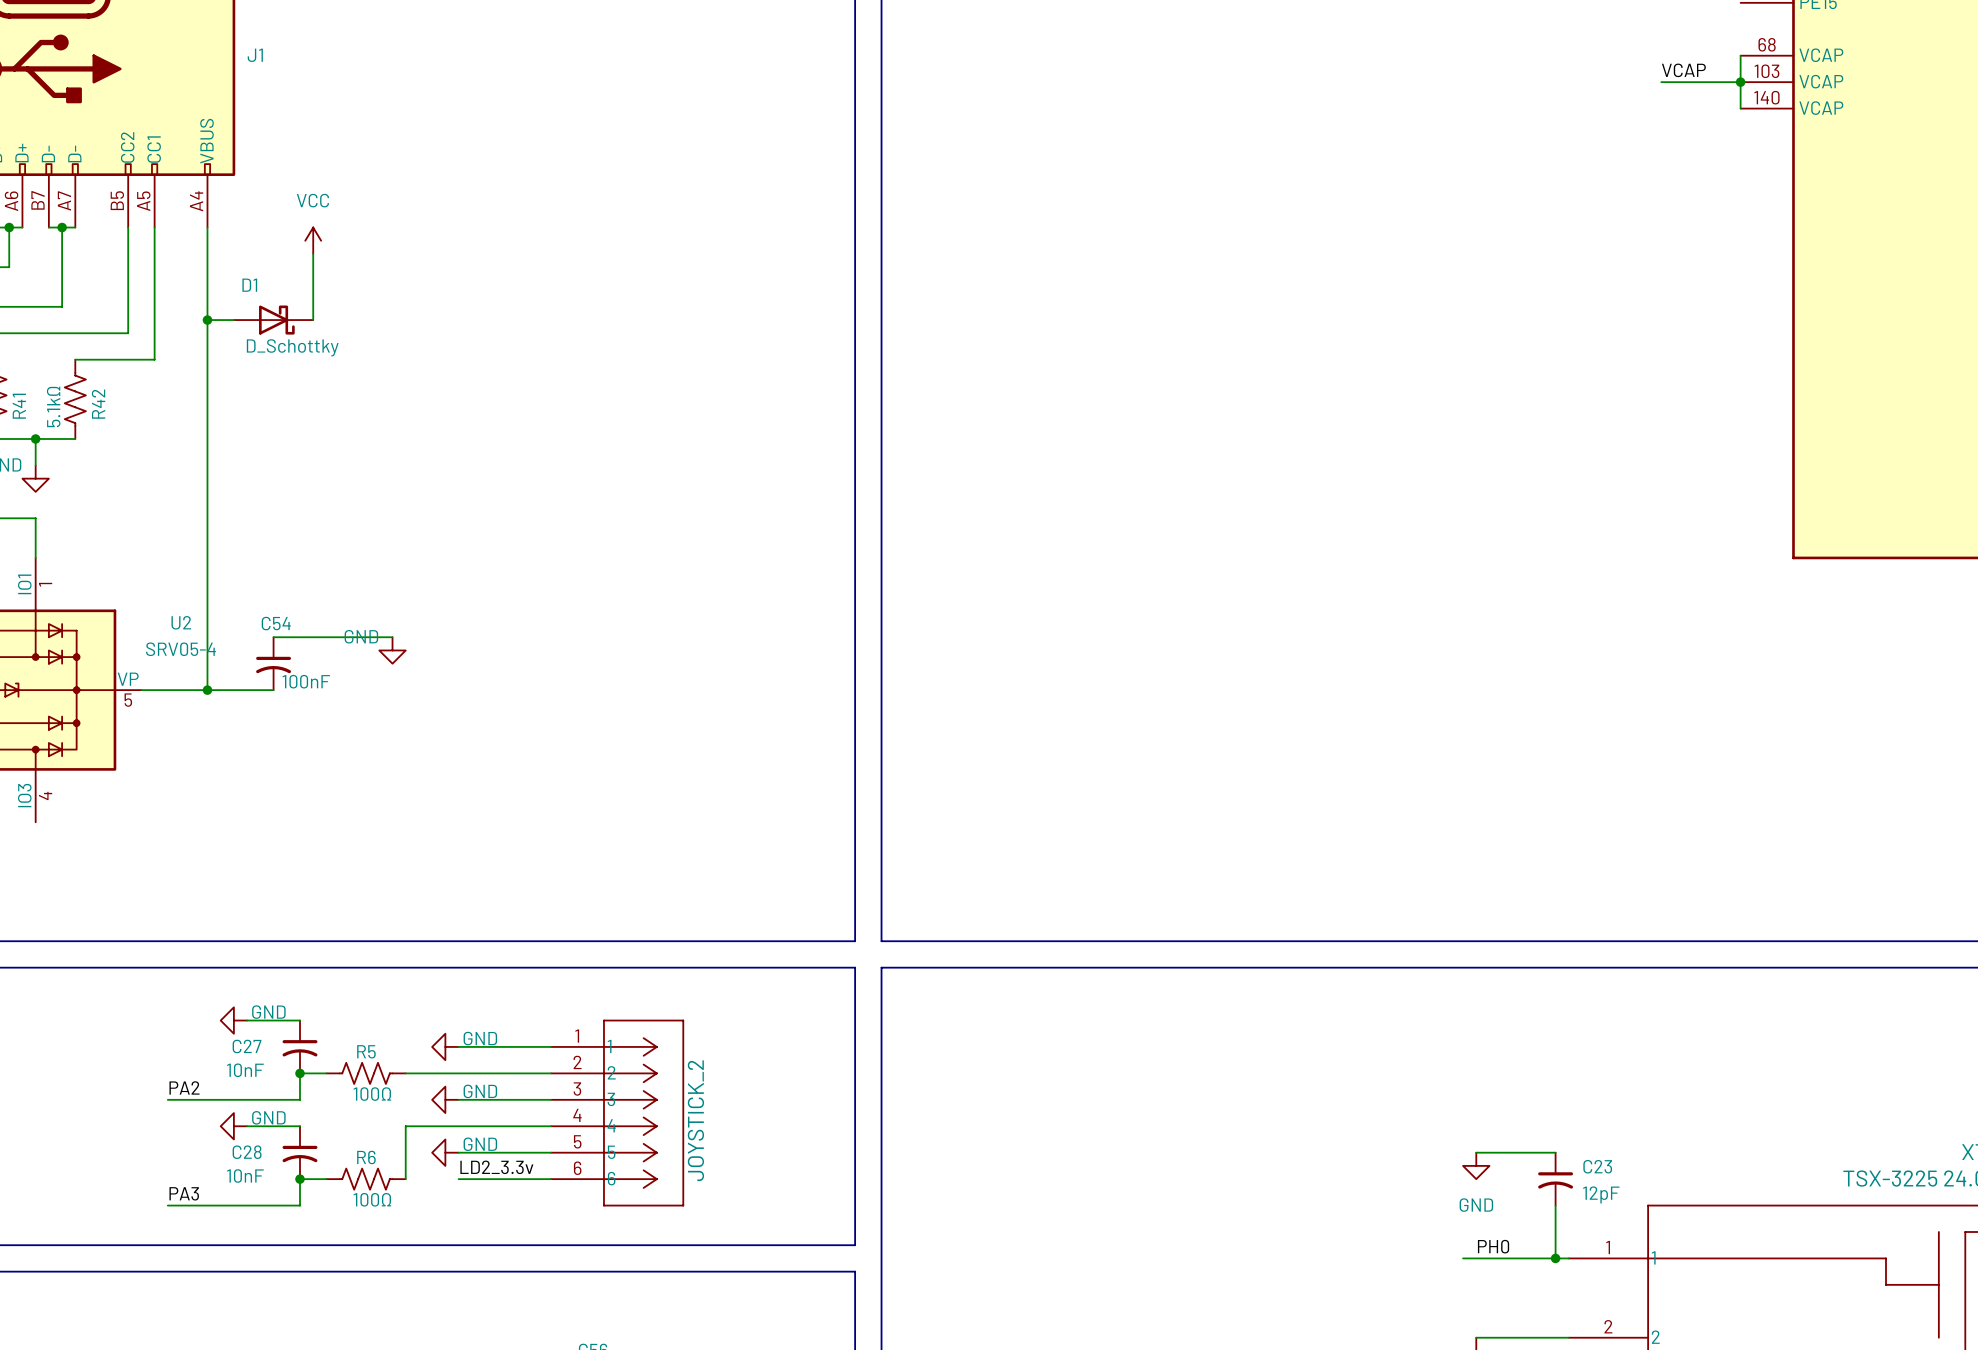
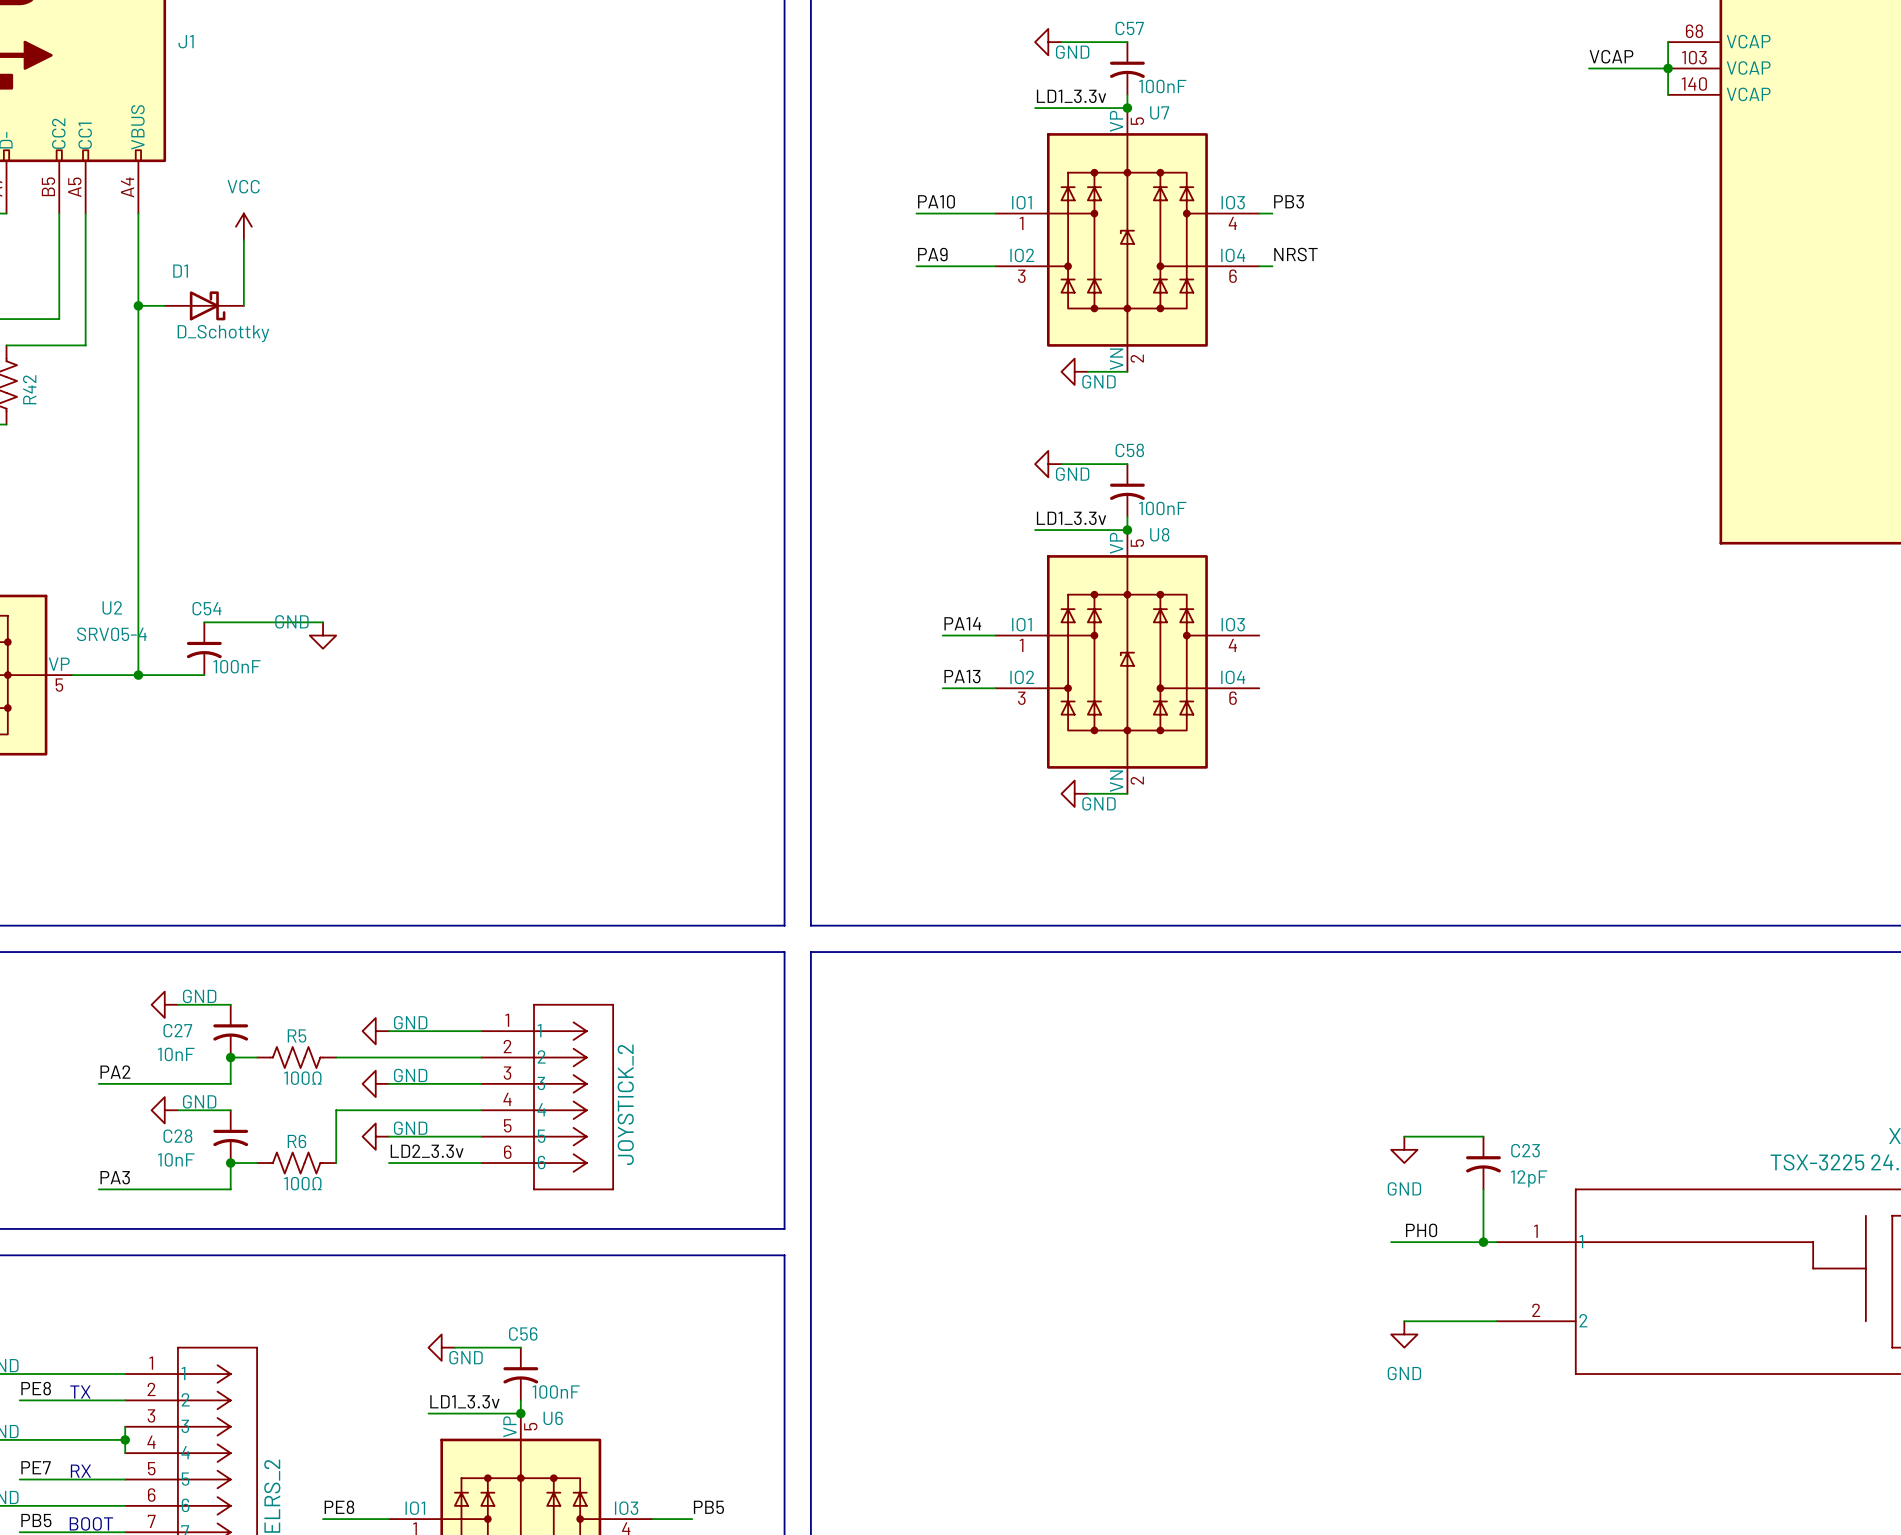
power symbol: none -> GND (1048, 42)
wire: none -> (1061, 42) (1127, 42)
C57: none -> 100nF (1127, 68)
wire: none -> (1127, 94) (1127, 108) (1035, 108)
label: none -> LD1_3.3v (1071, 96)
junction: none -> (1127, 108)
label: none -> PA10 (936, 201)
label: none -> PB3 (1289, 201)
wire: none -> (916, 213) (995, 213)
wire: none -> (1259, 213) (1272, 213)
U7: none -> (1127, 239)
label: none -> PA9 (932, 254)
label: none -> NRST (1295, 254)
wire: none -> (916, 266) (995, 266)
wire: none -> (1259, 266) (1272, 266)
power symbol: none -> GND (1074, 371)
wire: none -> (1087, 371) (1127, 371)
power symbol: none -> GND (1048, 464)
wire: none -> (1061, 464) (1127, 464)
C58: none -> 100nF (1127, 490)
wire: none -> (1127, 516) (1127, 530) (1035, 530)
label: none -> LD1_3.3v (1071, 518)
junction: none -> (1127, 530)
label: none -> PA14 (962, 623)
wire: none -> (942, 635) (995, 635)
U8: none -> (1127, 661)
label: none -> PA13 (962, 676)
wire: none -> (942, 688) (995, 688)
power symbol: none -> GND (1074, 793)
wire: none -> (1087, 793) (1127, 793)

